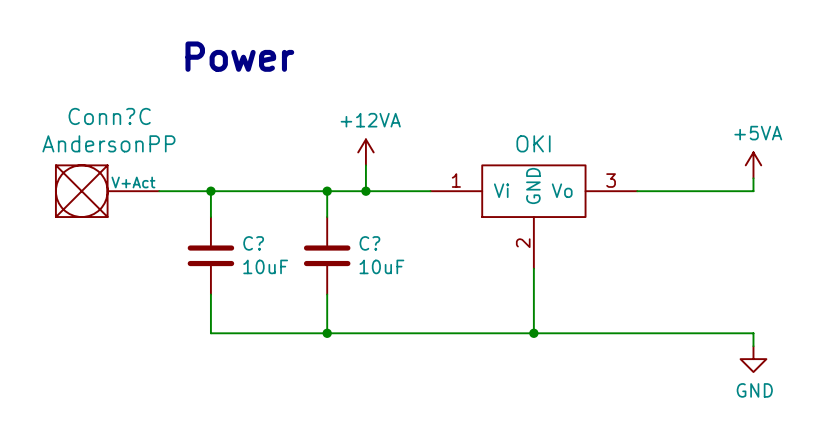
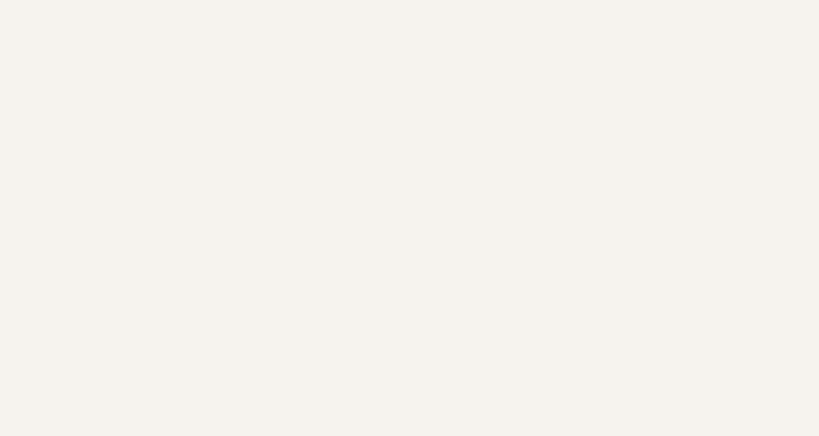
text: Power (239, 56) -> none
power symbol: +12VA (365, 152) -> none
wire: (365, 165) (365, 191) -> none
power symbol: +5VA (753, 165) -> none
wire: (753, 178) (753, 191) (637, 191) -> none
Conn?C: AndersonPP (107, 191) -> none
wire: (159, 191) (430, 191) -> none
wire: (210, 191) (210, 217) -> none
junction: (210, 191) -> none
wire: (327, 191) (327, 217) -> none
junction: (327, 191) -> none
junction: (365, 191) -> none
part: OKI (533, 217) -> none
C?: 10uF (210, 255) -> none
C?: 10uF (327, 255) -> none
wire: (533, 268) (533, 333) -> none
wire: (210, 294) (210, 333) (753, 333) (753, 346) -> none
wire: (327, 294) (327, 333) -> none
junction: (327, 333) -> none
junction: (533, 333) -> none
power symbol: GND (753, 359) -> none

